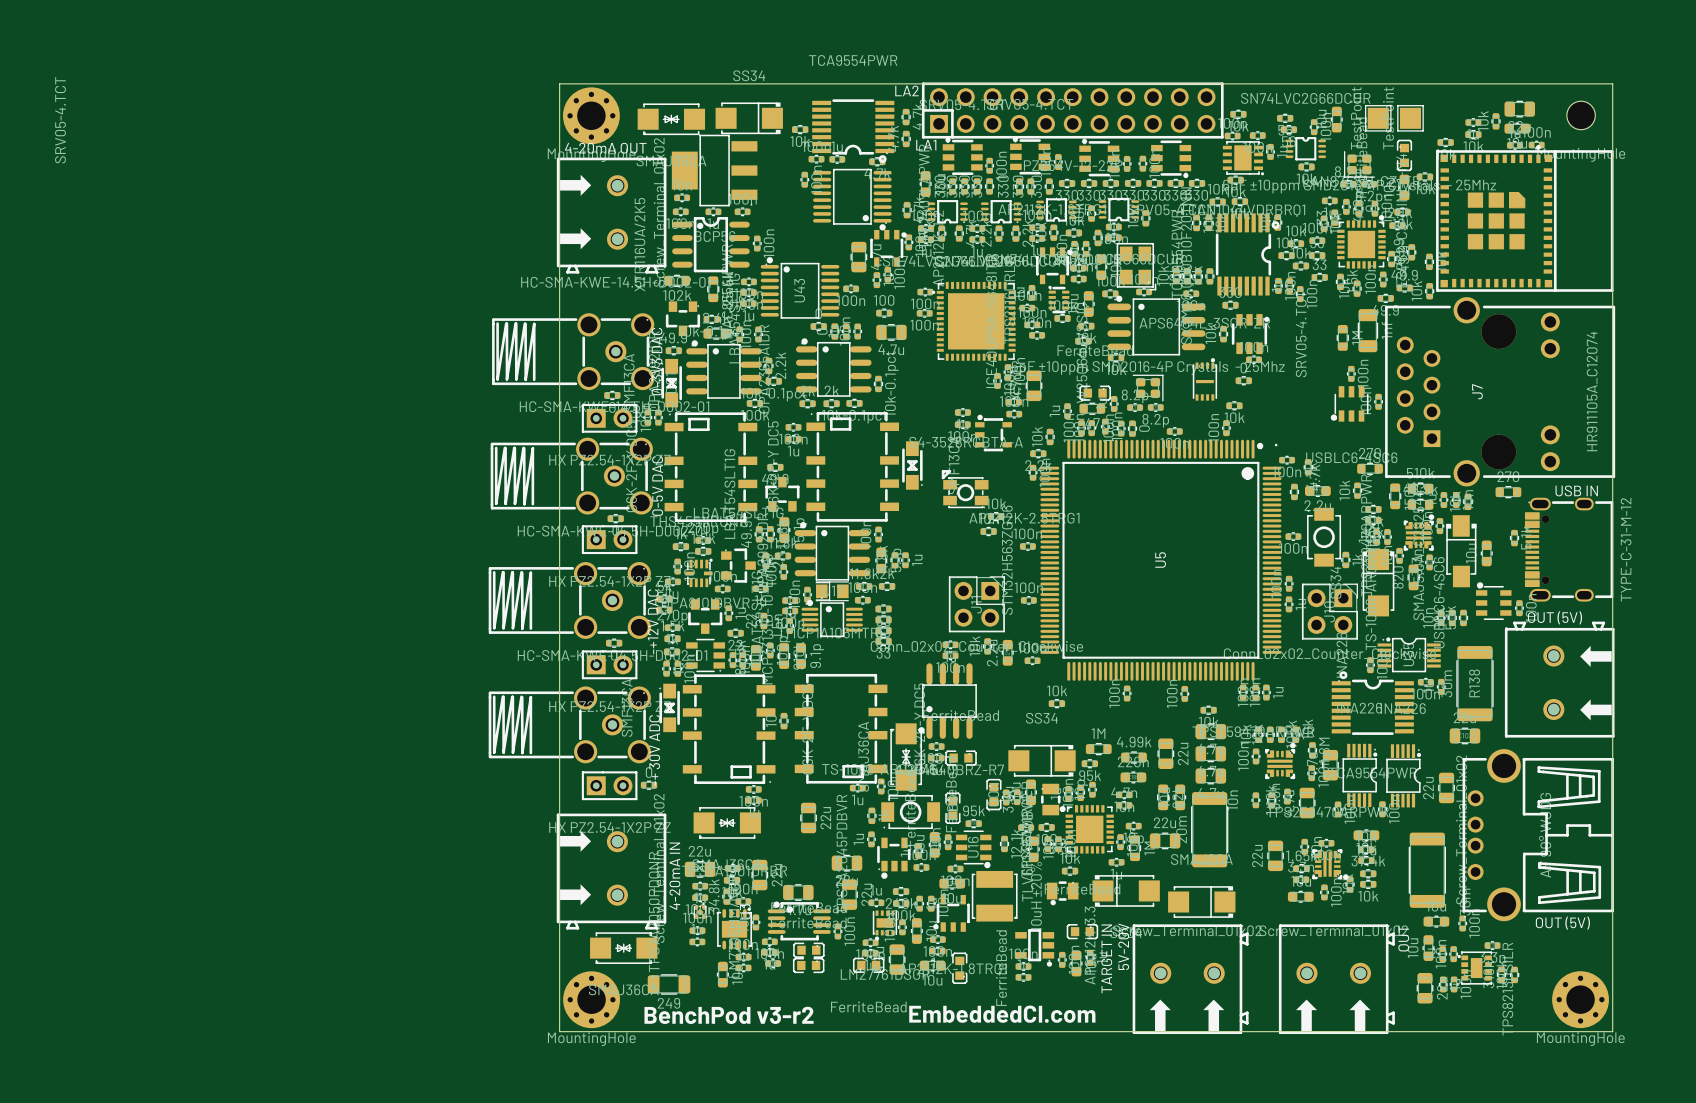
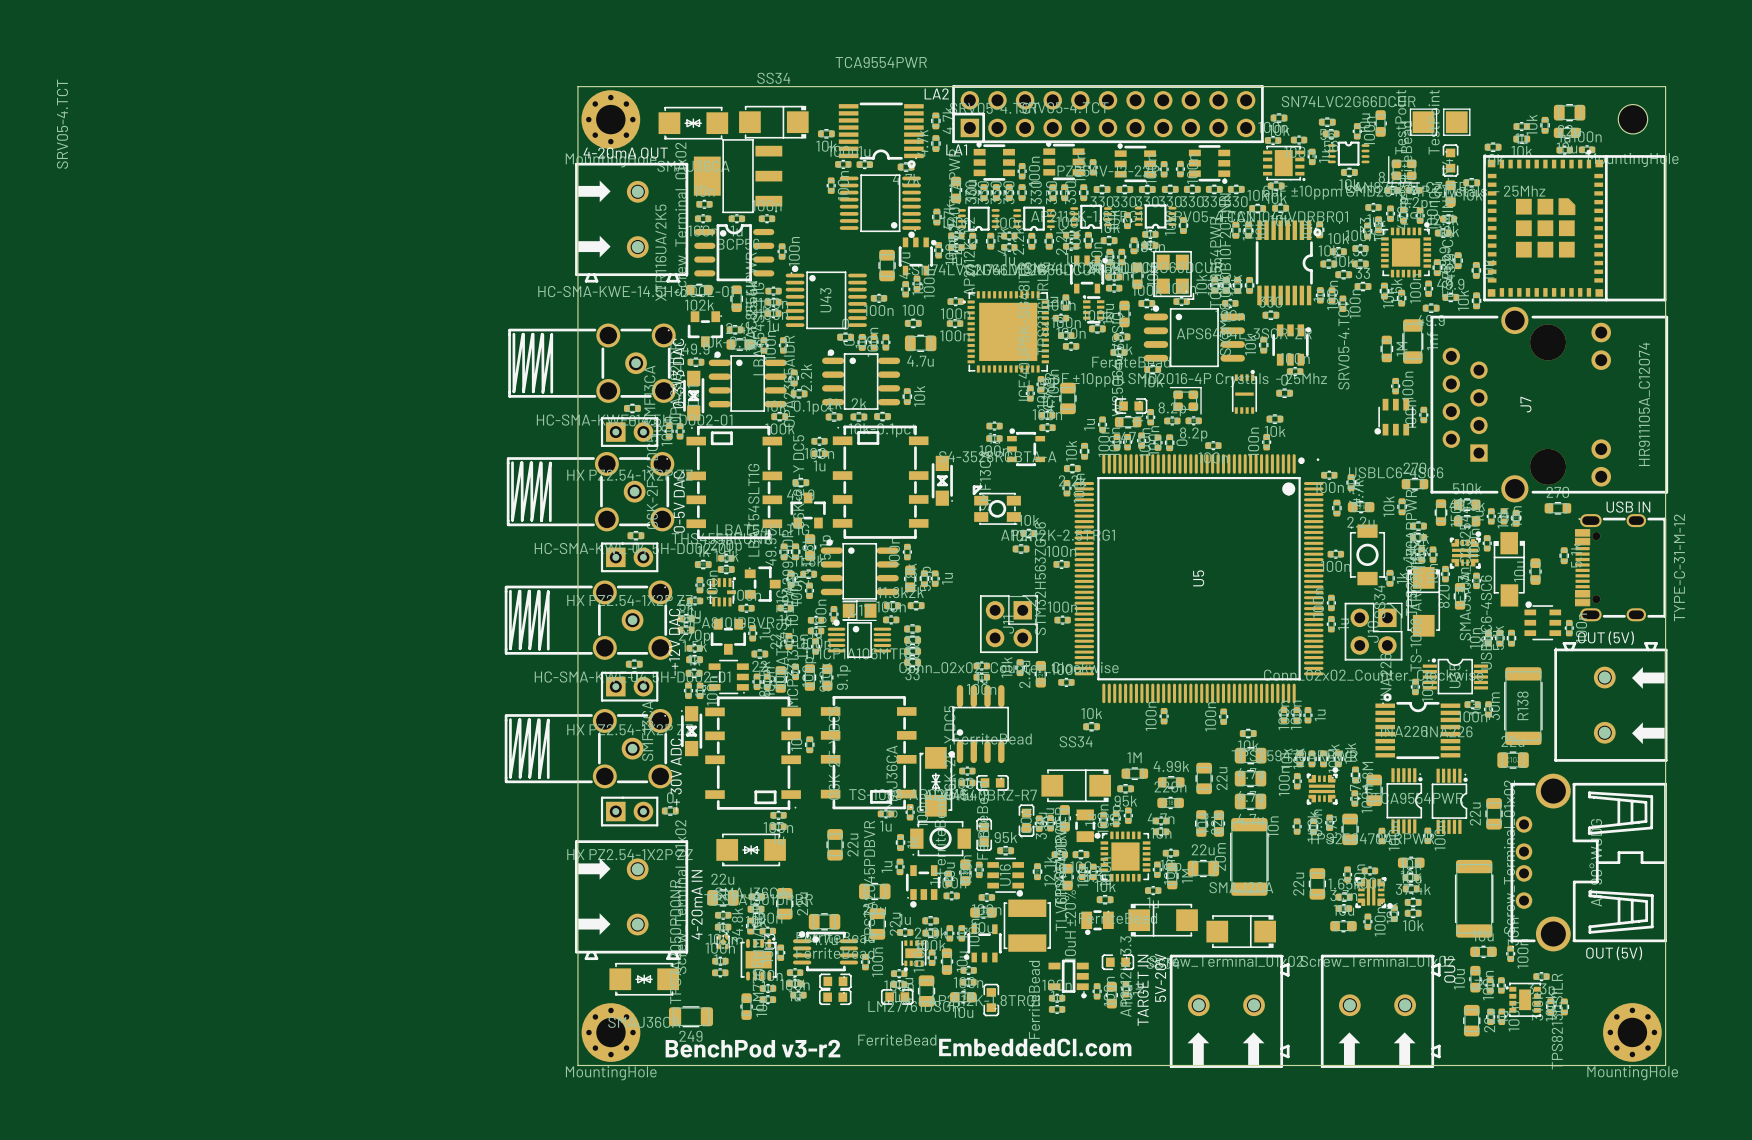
part value: 10k-0.1pct (891, 383) -> 10k (919, 396)

